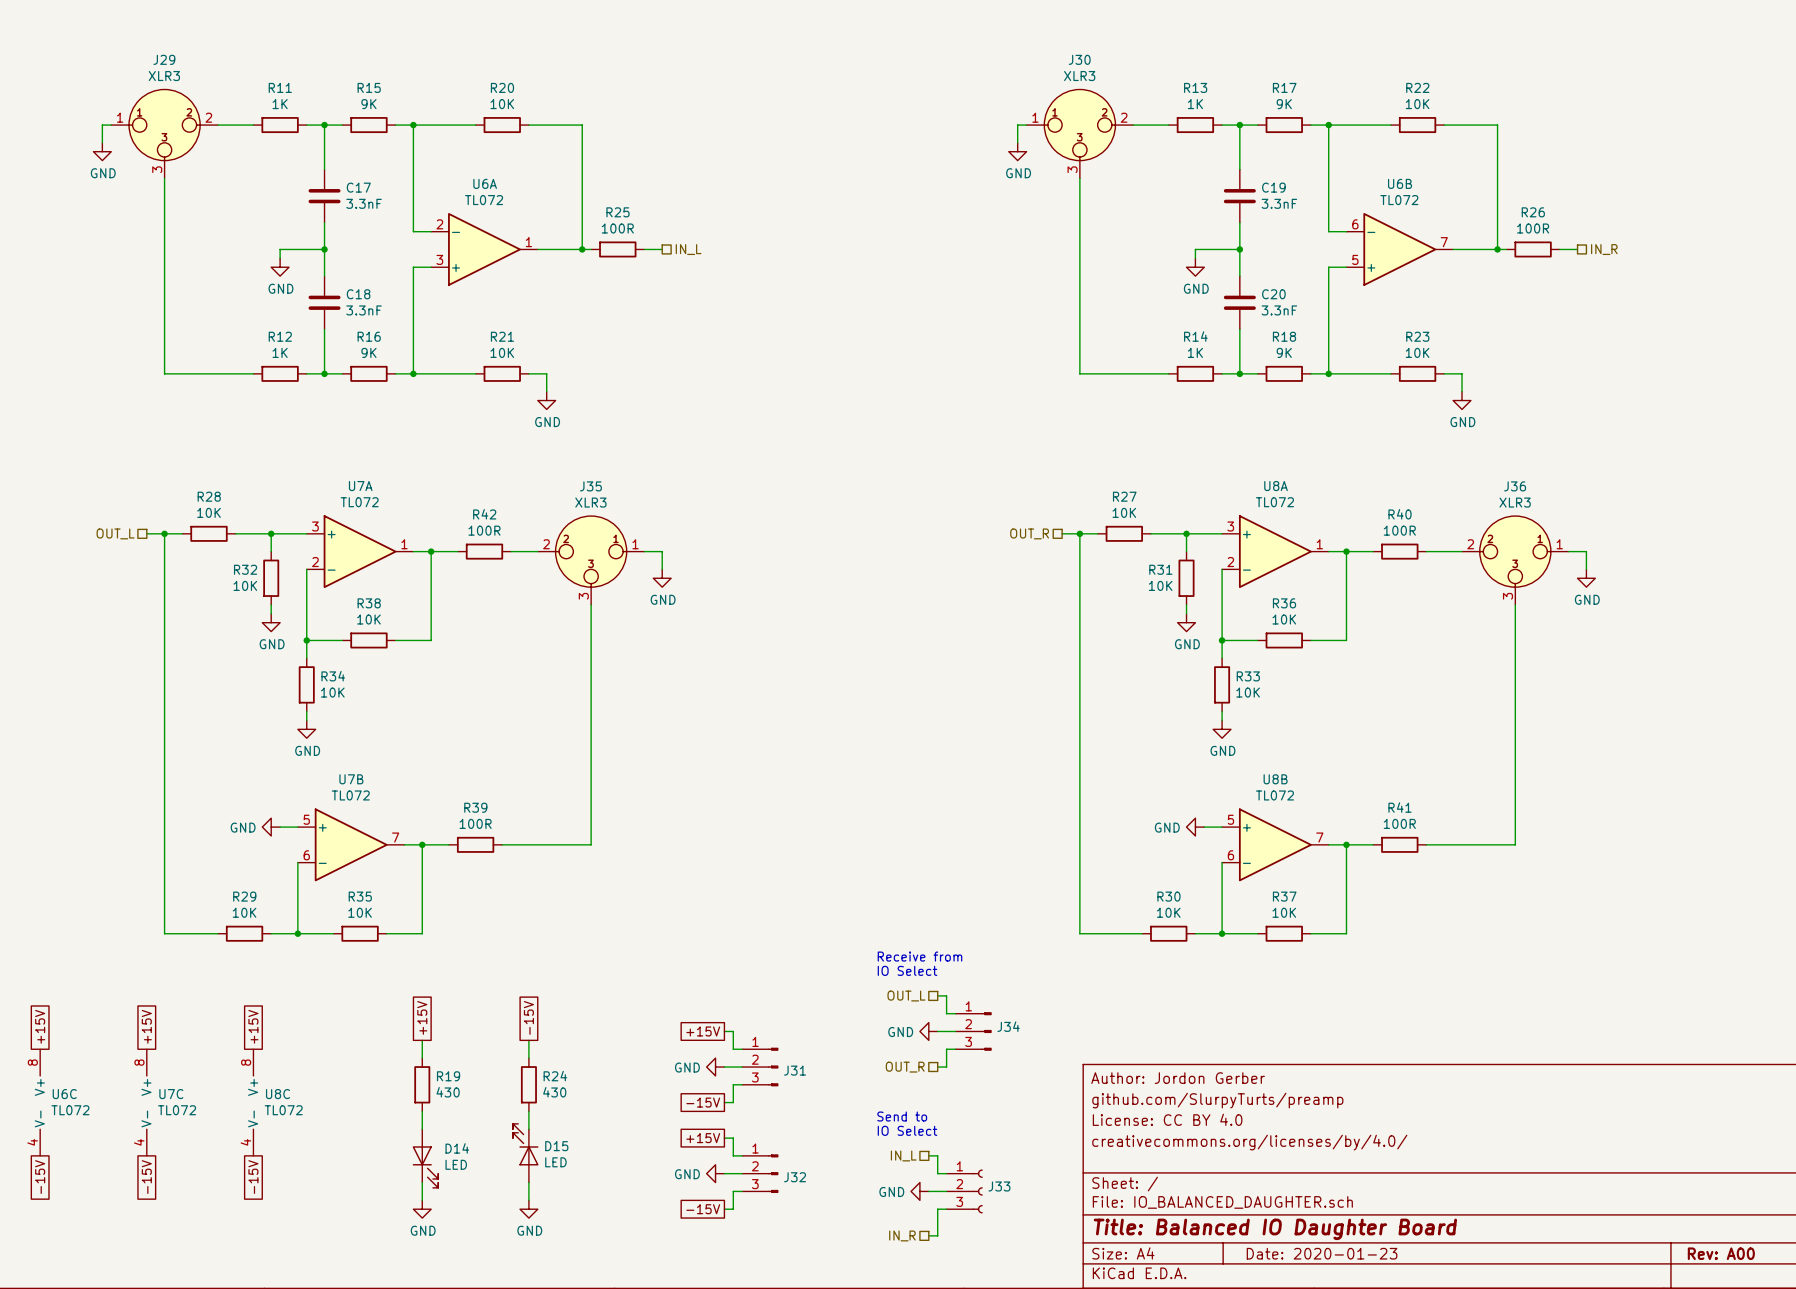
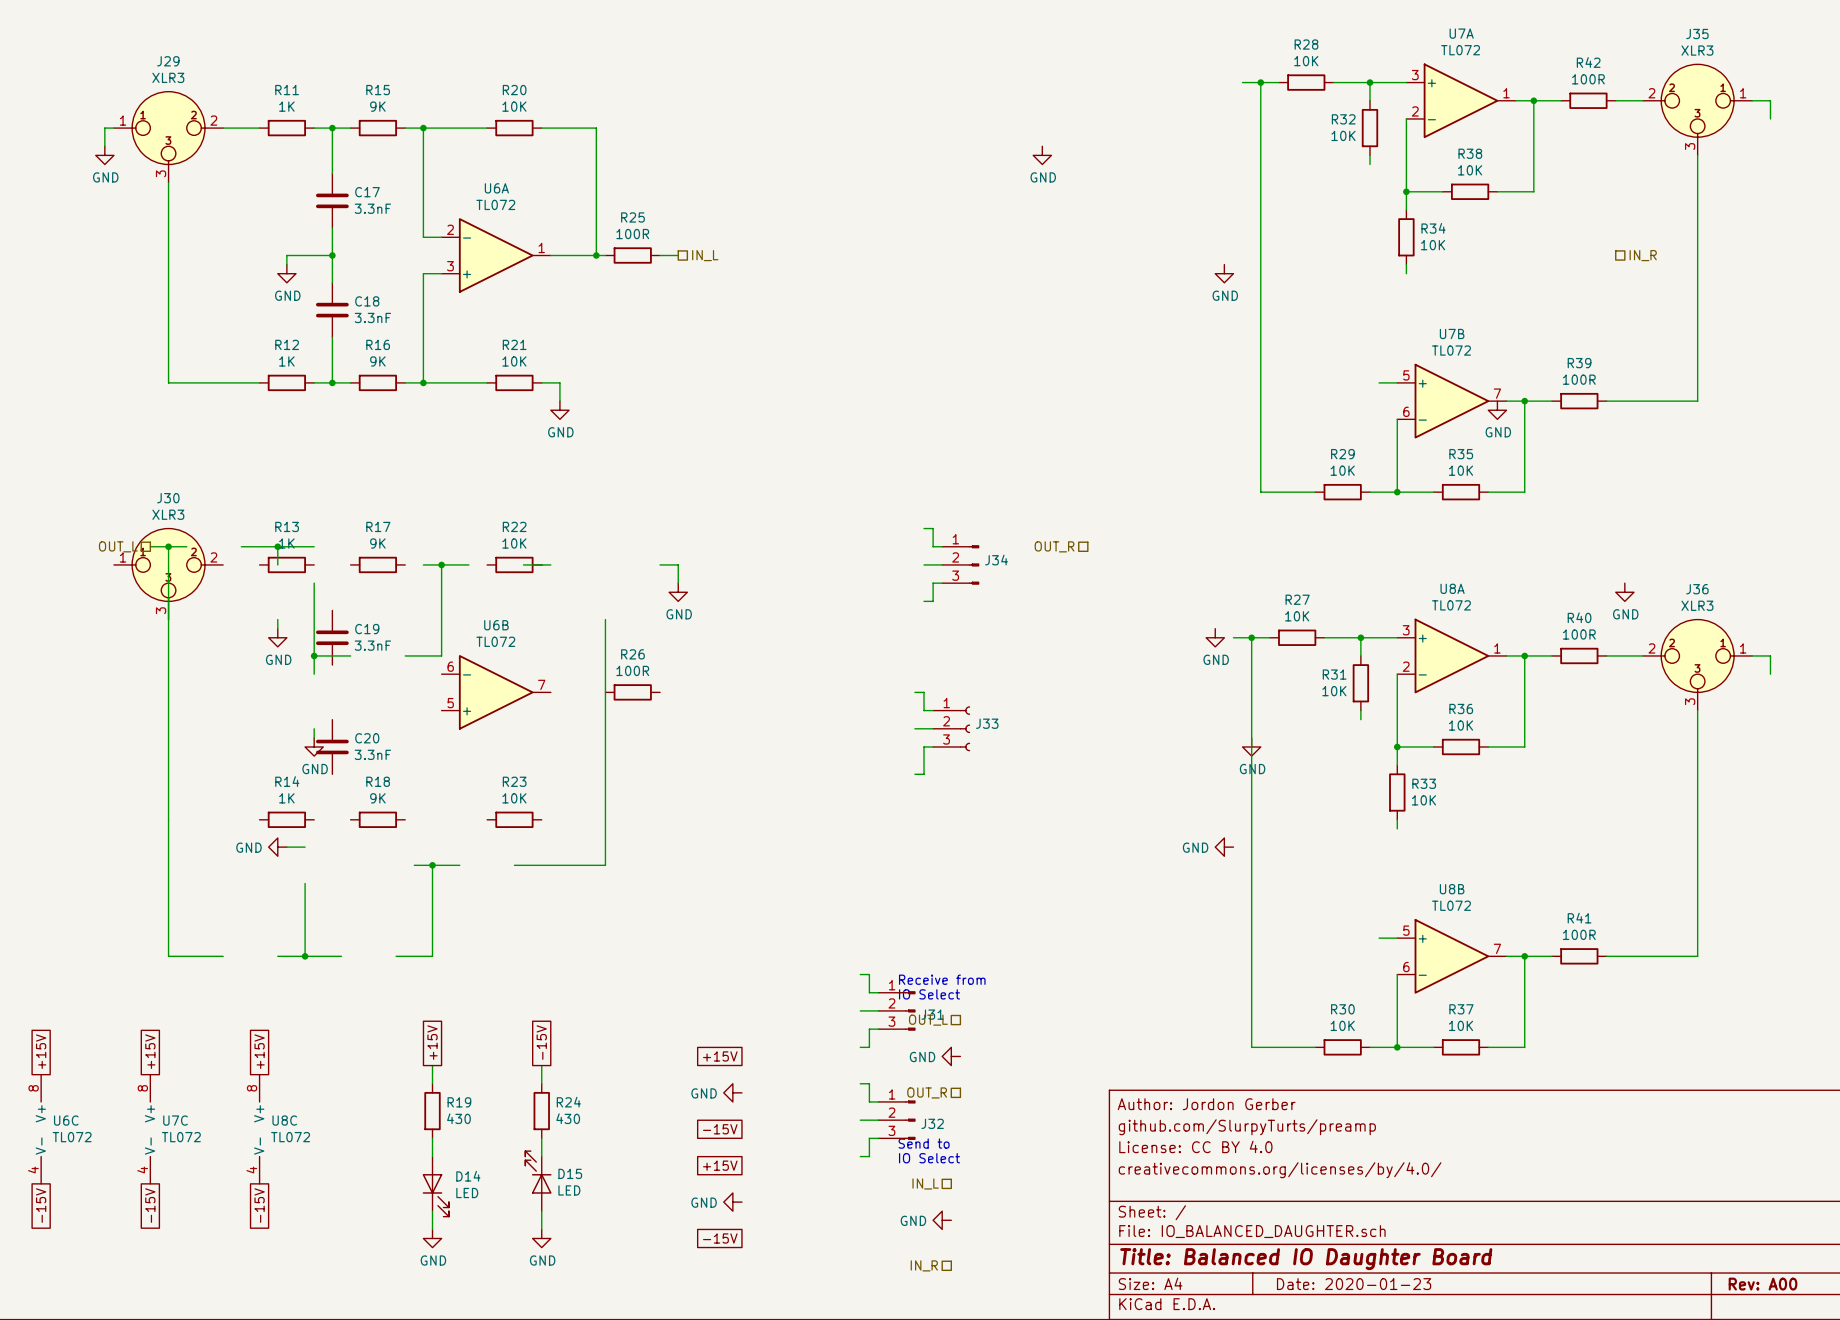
wire: none -> (1260, 82) (1260, 492) (1315, 492)
junction: none -> (1260, 82)
wire: none -> (1333, 82) (1406, 82)
wire: none -> (1369, 82) (1369, 100)
junction: none -> (1369, 82)
wire: none -> (1515, 100) (1561, 100)
junction: none -> (1533, 100)
wire: none -> (1615, 100) (1643, 100)
wire: none -> (1752, 100) (1770, 100) (1770, 118)
wire: none -> (1406, 118) (1406, 209)
wire: (1026, 125) (1017, 125) (1017, 142) -> none
wire: (1133, 125) (1168, 125) -> none
R13 position: (1195, 125) -> (286, 564)
wire: (1222, 125) (1257, 125) -> (1242, 82) (1278, 82)
wire: (1239, 125) (1239, 169) -> none
junction: (1239, 125) -> none
R17 position: (1284, 125) -> (377, 564)
wire: (1310, 125) (1390, 125) -> none
wire: (1328, 125) (1328, 231) (1346, 231) -> none
junction: (1328, 125) -> none
R22 position: (1417, 125) -> (514, 564)
wire: (1444, 125) (1497, 125) -> (1533, 100) (1533, 128)
J30 position: (1079, 133) -> (168, 574)
wire: none -> (1369, 155) (1369, 164)
wire: none -> (1697, 155) (1697, 401) (1606, 401)
wire: (1079, 178) (1079, 373) (1168, 373) -> none
wire: none -> (1406, 191) (1442, 191)
junction: none -> (1406, 191)
wire: (1497, 187) (1497, 249) -> (1533, 191) (1497, 191)
C19 position: (1239, 196) -> (332, 637)
wire: (1239, 222) (1239, 276) -> none
wire: (1239, 249) (1195, 249) (1195, 258) -> none
junction: (1239, 249) -> none
U6B position: (1399, 249) -> (496, 692)
wire: (1453, 249) (1506, 249) -> none
junction: (1497, 249) -> none
R26 position: (1533, 249) -> (632, 692)
wire: (1559, 249) (1577, 249) -> none
wire: (1346, 267) (1328, 267) (1328, 373) -> none
C20 position: (1239, 302) -> (332, 746)
wire: (1239, 329) (1239, 373) -> none
R14 position: (1195, 373) -> (286, 819)
wire: (1222, 373) (1257, 373) -> none
junction: (1239, 373) -> none
R18 position: (1284, 373) -> (377, 819)
wire: (1310, 373) (1346, 373) -> none
junction: (1328, 373) -> none
R23 position: (1417, 373) -> (514, 819)
wire: (1444, 373) (1462, 373) (1462, 391) -> none
wire: none -> (1506, 401) (1552, 401)
wire: none -> (1524, 401) (1524, 492) (1488, 492)
junction: none -> (1524, 401)
wire: none -> (1397, 419) (1397, 492)
wire: none -> (1369, 492) (1433, 492)
junction: none -> (1397, 492)
wire: none -> (924, 528) (933, 528) (933, 546) (942, 546)
R28 position: (209, 533) -> (1306, 82)
wire: (1062, 533) (1097, 533) -> (1233, 637) (1269, 637)
wire: (1079, 533) (1079, 933) (1142, 933) -> none
junction: (1079, 533) -> none
R27 position: (1124, 533) -> (1297, 637)
wire: (1150, 533) (1222, 533) -> (1324, 637) (1397, 637)
wire: (1186, 533) (1186, 551) -> (1360, 637) (1360, 655)
junction: (1186, 533) -> none
U7A position: (360, 551) -> (1461, 100)
R42 position: (484, 551) -> (1588, 100)
wire: none -> (924, 564) (942, 564)
U8A position: (1275, 551) -> (1451, 655)
wire: (1328, 551) (1373, 551) -> (1506, 655) (1552, 655)
wire: (1346, 551) (1346, 640) (1310, 640) -> (1524, 655) (1524, 746) (1488, 746)
junction: (1346, 551) -> none
R40 position: (1399, 551) -> (1579, 655)
wire: (1426, 551) (1462, 551) -> (1606, 655) (1643, 655)
wire: (1568, 551) (1586, 551) (1586, 569) -> (1752, 655) (1770, 655) (1770, 674)
J35 position: (591, 560) -> (1697, 109)
J36 position: (1515, 560) -> (1697, 665)
wire: none -> (942, 583) (933, 583) (933, 601) (924, 601)
wire: (1222, 569) (1222, 622) -> (1251, 674) (1251, 728)
R32 position: (271, 578) -> (1369, 128)
R31 position: (1186, 578) -> (1360, 683)
wire: (1186, 604) (1186, 613) -> (1360, 710) (1360, 719)
wire: (1515, 604) (1515, 844) (1426, 844) -> (1697, 710) (1697, 956) (1606, 956)
junction: none -> (1360, 637)
R38 position: (368, 640) -> (1470, 191)
wire: (1222, 640) (1257, 640) -> (1397, 746) (1433, 746)
junction position: (1222, 640) -> (1251, 637)
R36 position: (1284, 640) -> (1461, 746)
junction: none -> (1524, 655)
wire: none -> (1397, 674) (1397, 765)
wire: none -> (914, 692) (924, 692) (924, 710) (933, 710)
R34 position: (306, 684) -> (1406, 237)
R33 position: (1222, 684) -> (1397, 792)
wire: none -> (914, 728) (933, 728)
wire: none -> (1251, 737) (1251, 883)
wire: none -> (933, 746) (924, 746) (924, 774) (914, 774)
junction: none -> (1397, 746)
wire: none -> (1397, 819) (1397, 828)
wire: (1204, 827) (1222, 827) -> (1379, 938) (1397, 938)
U7B position: (351, 844) -> (1451, 401)
R39 position: (475, 844) -> (1579, 401)
U8B position: (1275, 844) -> (1451, 956)
wire: (1328, 844) (1373, 844) -> (1506, 956) (1552, 956)
wire: (1346, 844) (1346, 933) (1310, 933) -> (1524, 956) (1524, 1047) (1488, 1047)
junction: (1346, 844) -> none
R41 position: (1399, 844) -> (1579, 956)
R29 position: (244, 933) -> (1342, 492)
R35 position: (360, 933) -> (1461, 492)
R30 position: (1168, 933) -> (1342, 1047)
wire: (1195, 933) (1257, 933) -> (1369, 1047) (1433, 1047)
wire: none -> (1251, 956) (1251, 1047) (1315, 1047)
junction: (1222, 933) -> none
R37 position: (1284, 933) -> (1461, 1047)
junction: none -> (1524, 956)
wire: none -> (1397, 974) (1397, 1047)
wire: (937, 995) (946, 995) (946, 1013) (955, 1013) -> none
junction: none -> (1397, 1047)
wire: (724, 1031) (733, 1031) (733, 1049) (742, 1049) -> (860, 974) (869, 974) (869, 992) (878, 992)
wire: (937, 1031) (955, 1031) -> none
J34 position: (973, 1031) -> (960, 564)
wire: (955, 1049) (946, 1049) (946, 1067) (937, 1067) -> none
wire: (724, 1067) (742, 1067) -> (860, 1010) (878, 1010)
J31 position: (760, 1067) -> (896, 1010)
wire: (742, 1084) (733, 1084) (733, 1102) (724, 1102) -> (878, 1029) (869, 1029) (869, 1047) (860, 1047)
wire: (724, 1138) (733, 1138) (733, 1155) (742, 1155) -> (860, 1083) (869, 1083) (869, 1101) (878, 1101)
wire: (928, 1155) (937, 1155) (937, 1173) (946, 1173) -> none
wire: (724, 1173) (742, 1173) -> (860, 1120) (878, 1120)
J32 position: (760, 1173) -> (896, 1120)
wire: (742, 1191) (733, 1191) (733, 1209) (724, 1209) -> (878, 1138) (869, 1138) (869, 1156) (860, 1156)
wire: (928, 1191) (946, 1191) -> none
J33 position: (964, 1191) -> (951, 728)
wire: (946, 1209) (937, 1209) (937, 1235) (928, 1235) -> none

